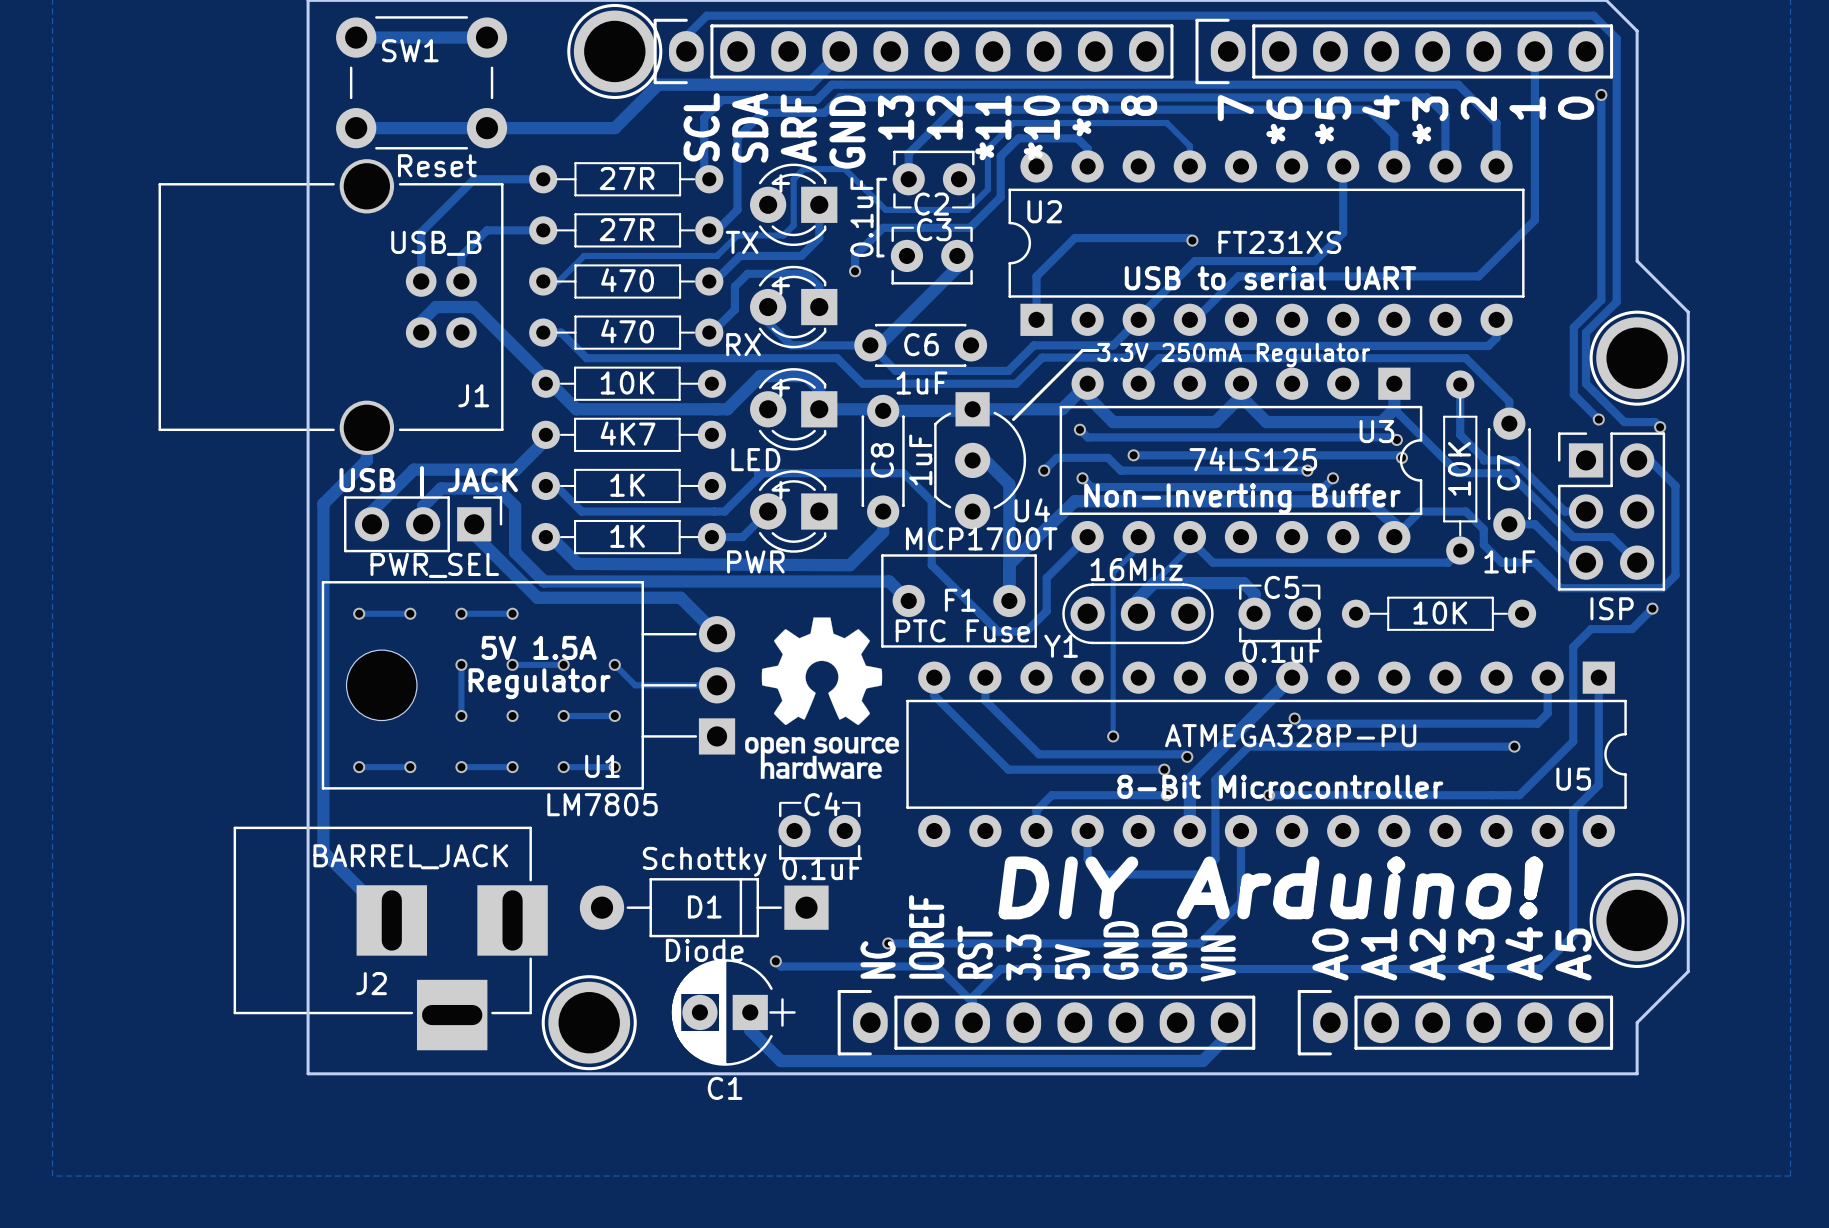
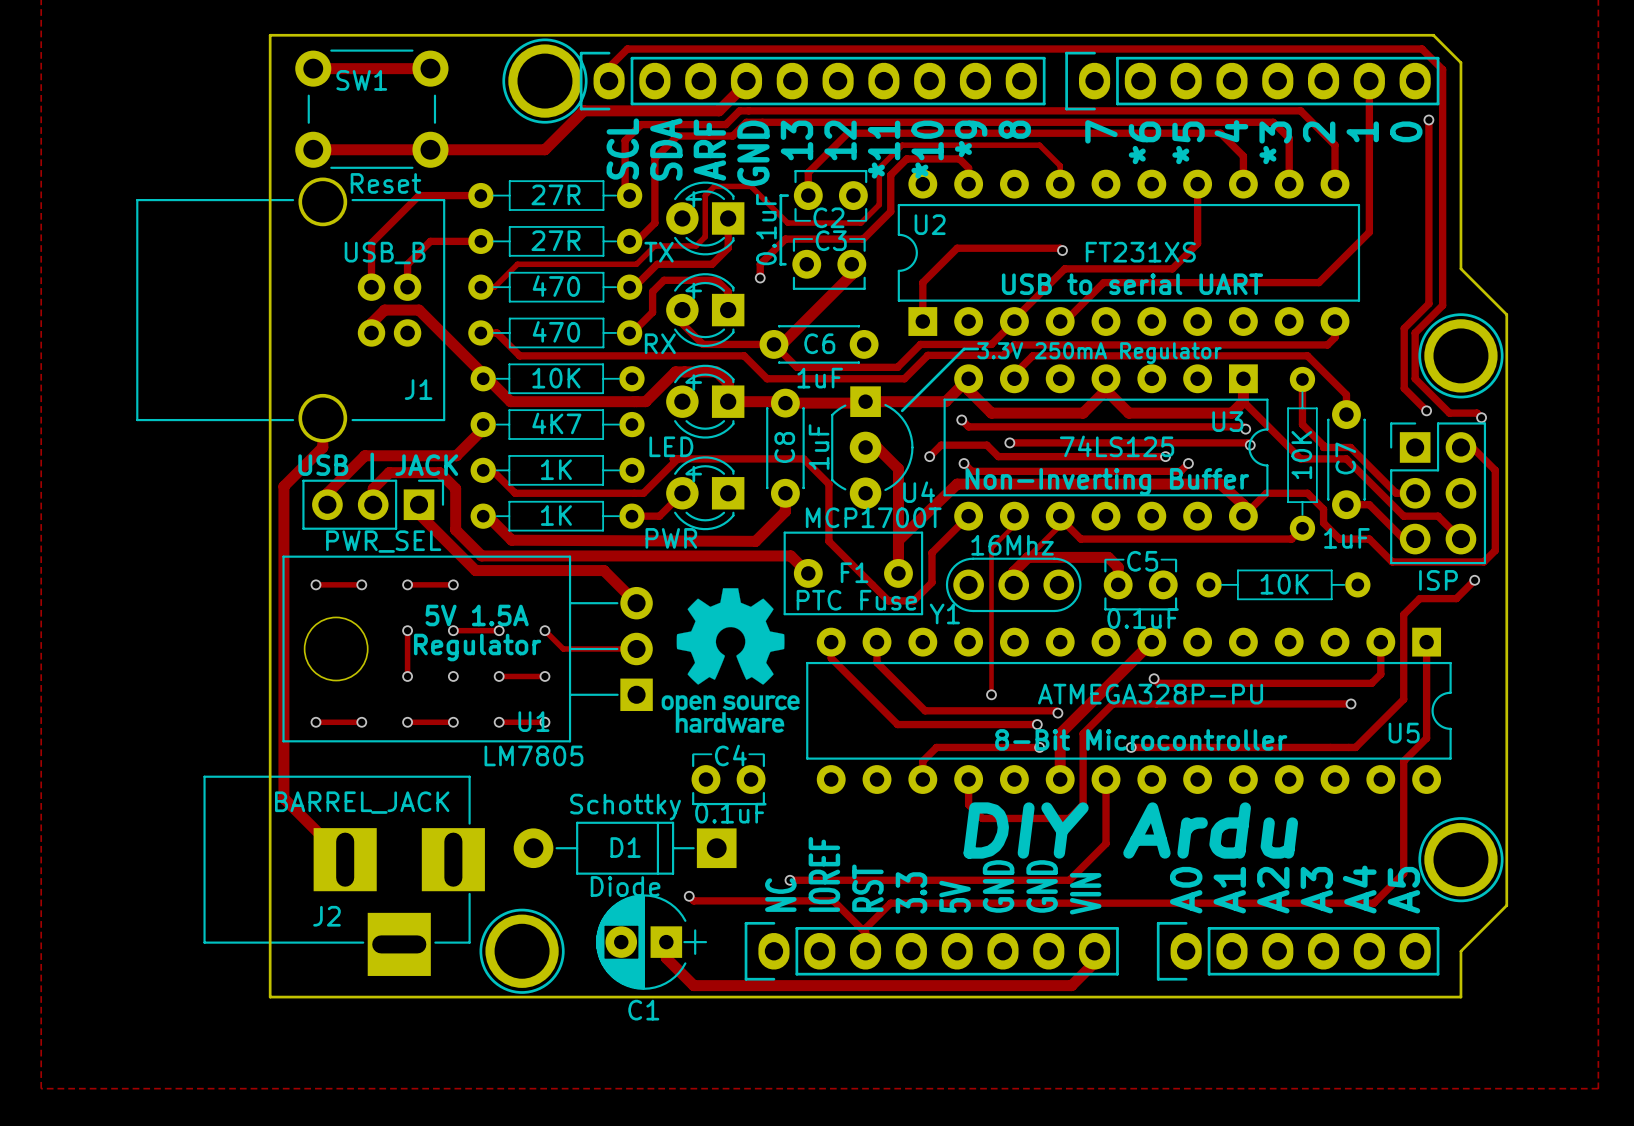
text: DIY Arduino! (1270, 887) -> DIY Ardu (1130, 830)

